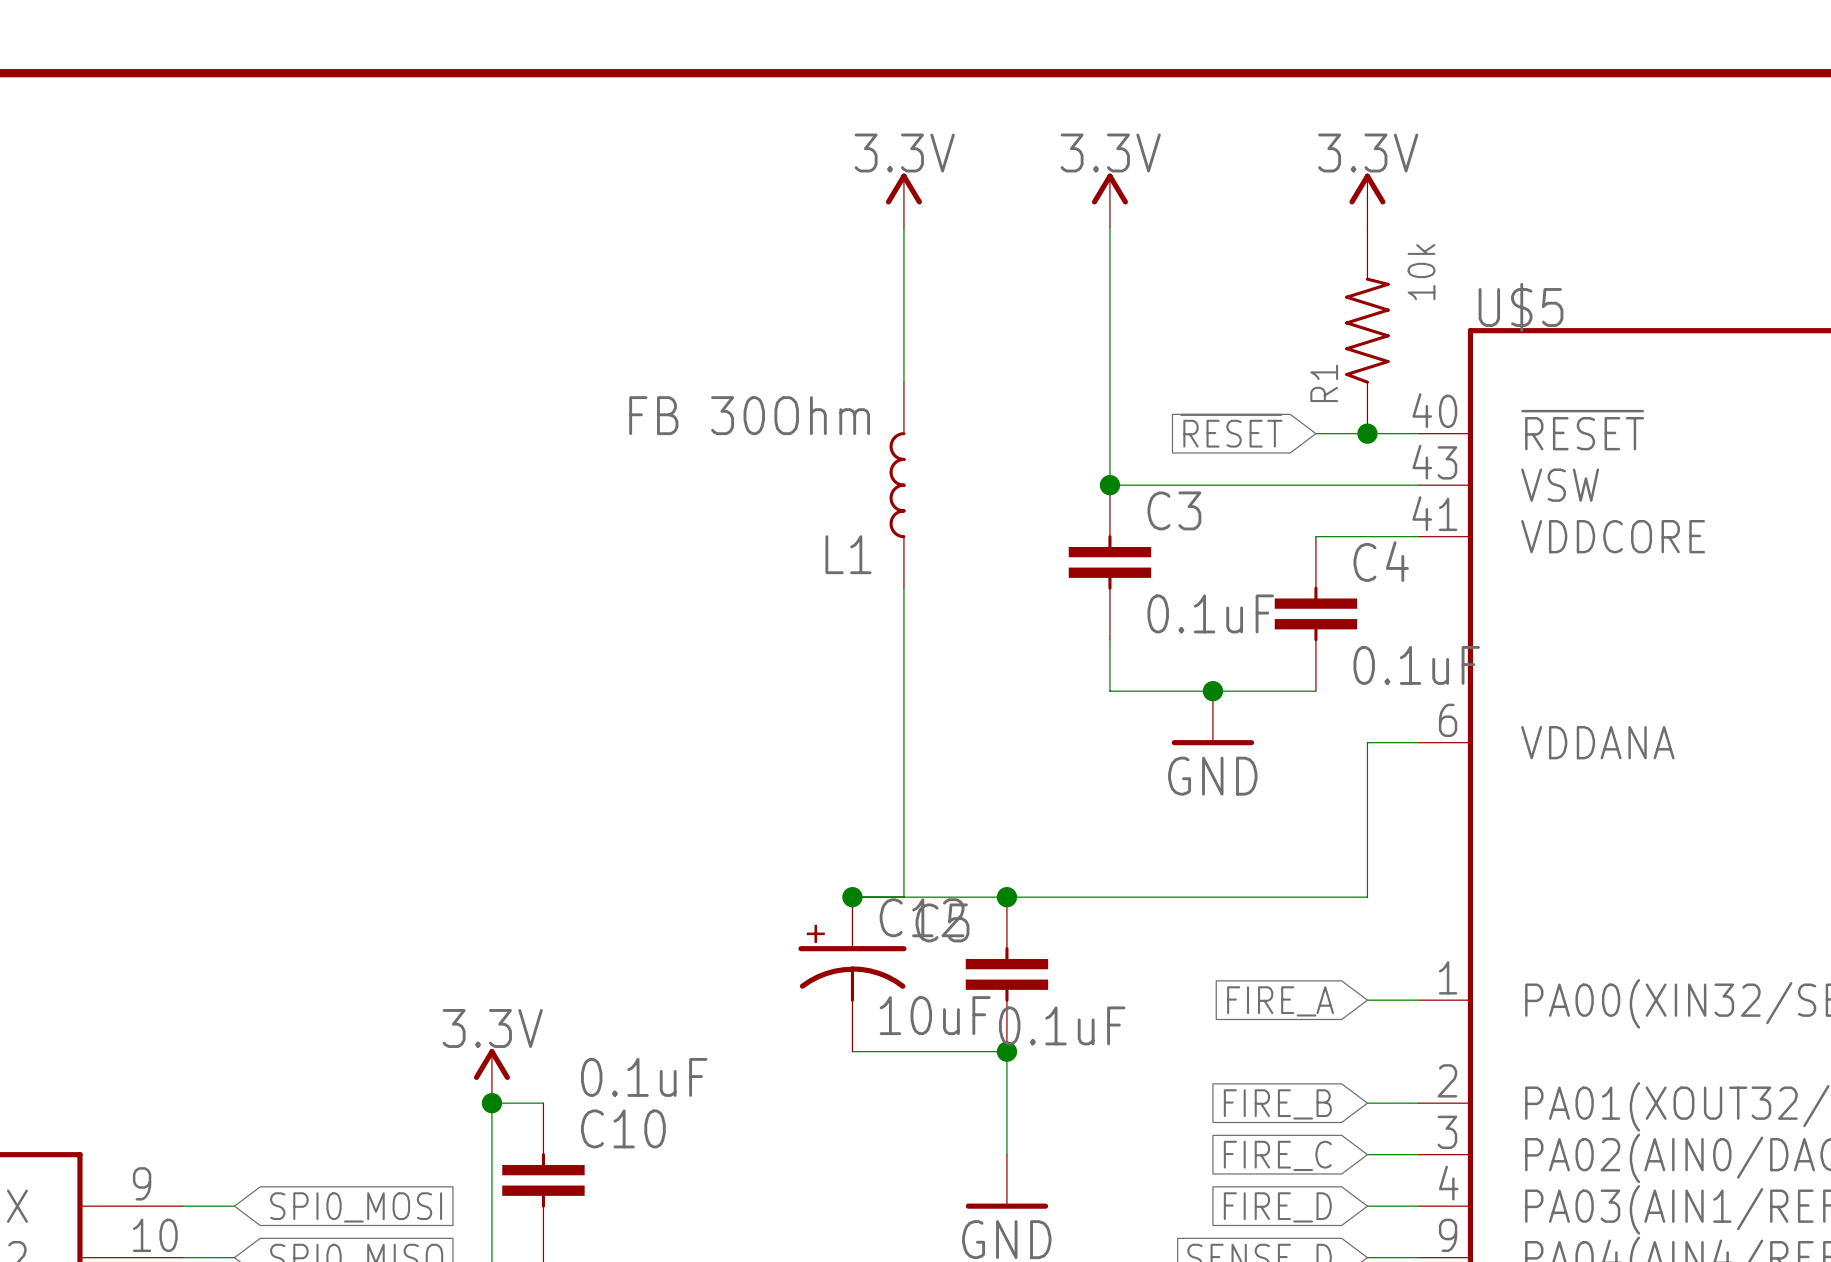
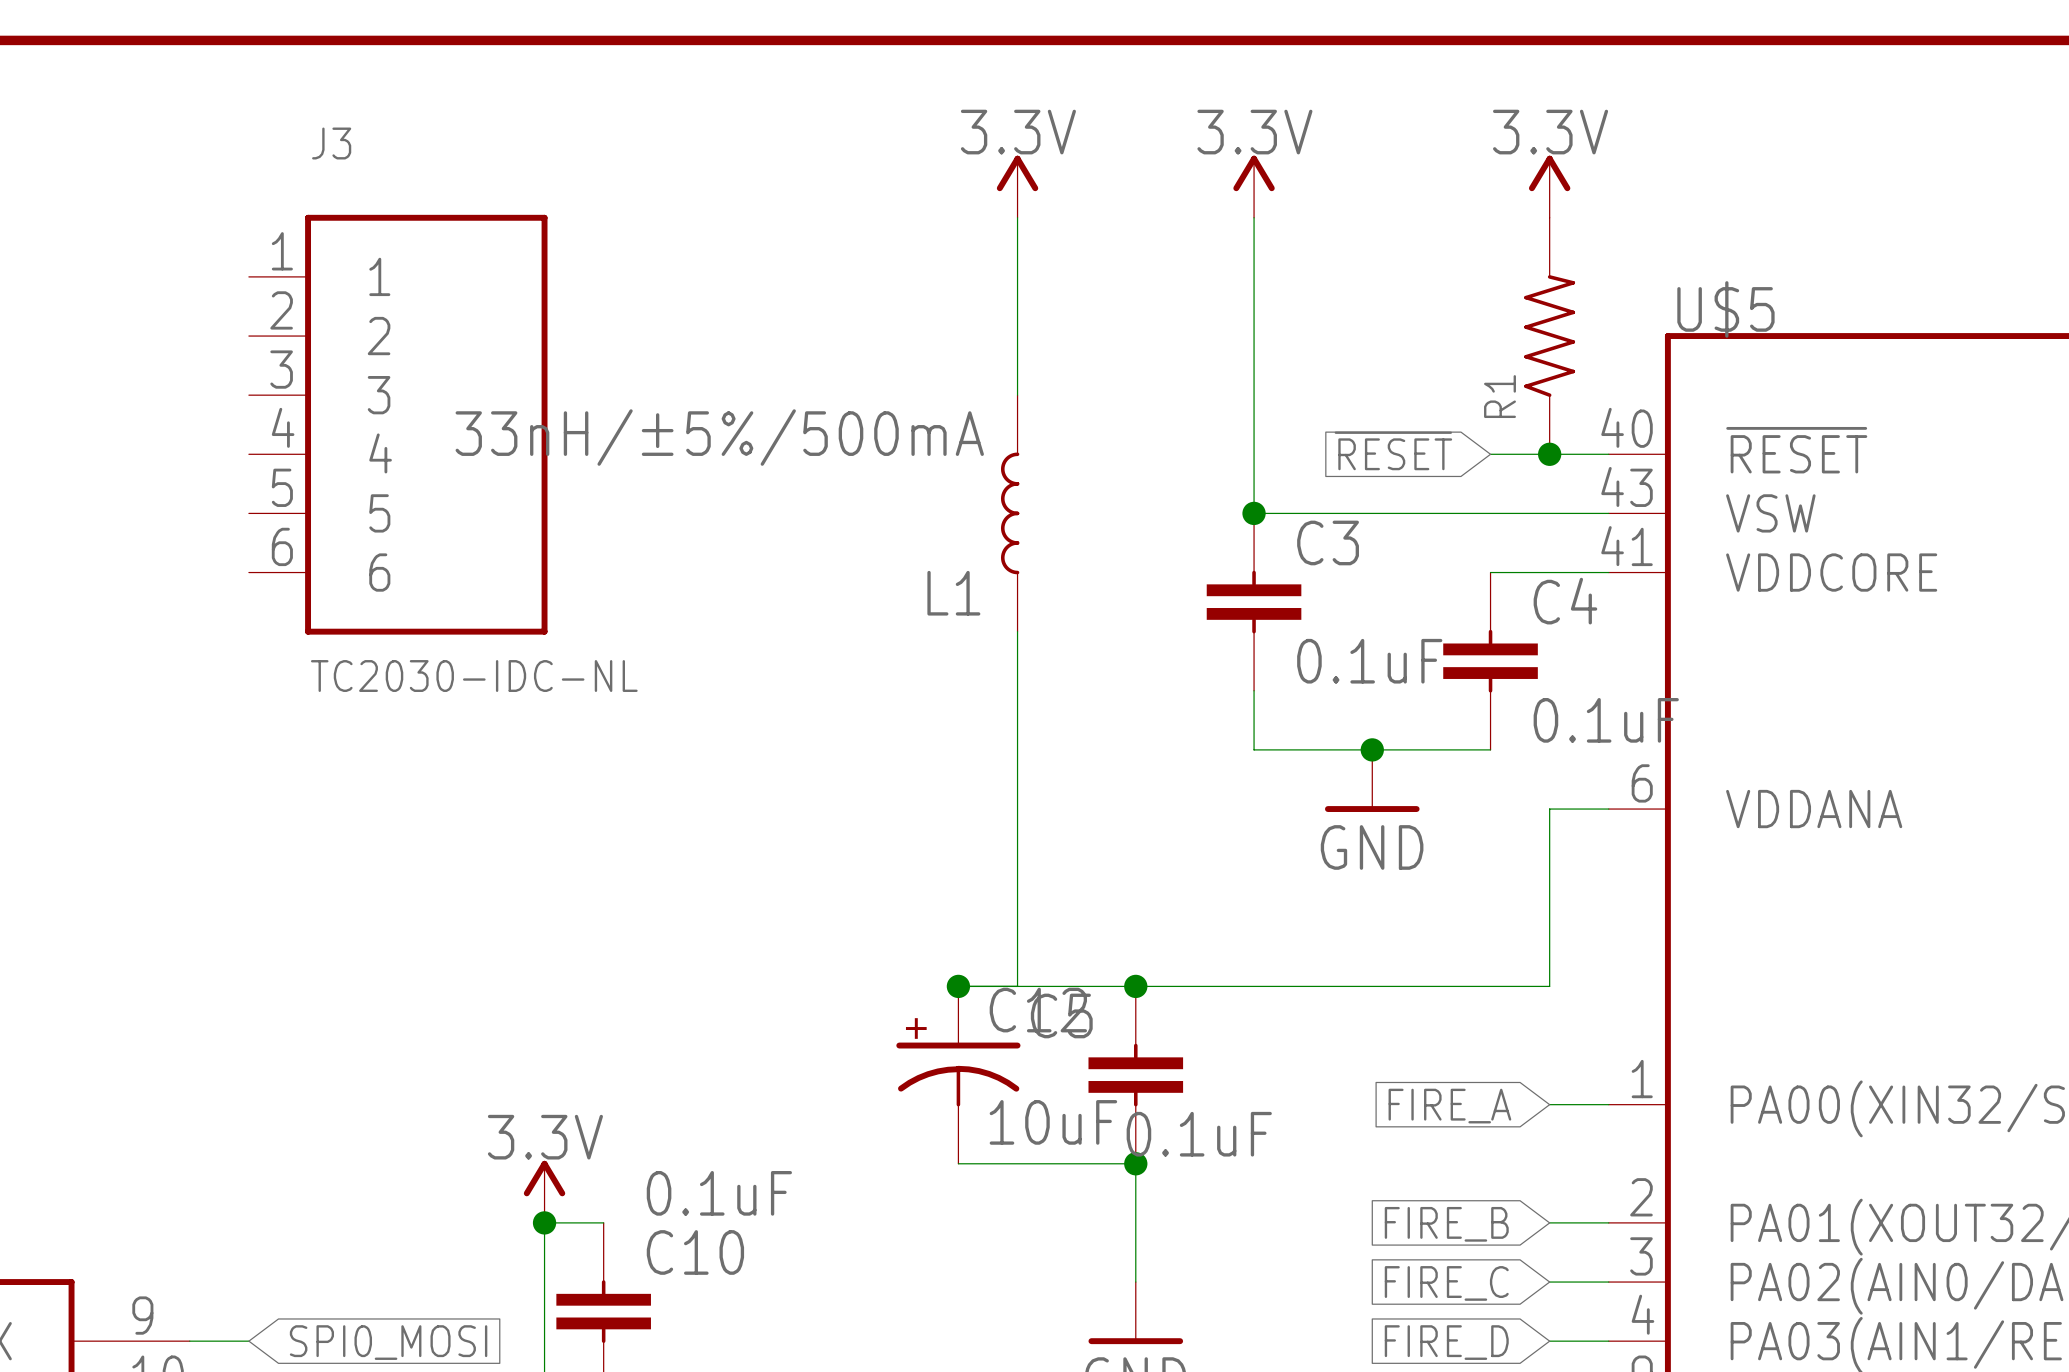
R1 value: 10k (1421, 272) -> none
J3: none -> TC2030-IDC-NL (398, 424)
L1 value: FB 30Ohm (749, 415) -> 33nH/±5%/500mA (719, 437)

